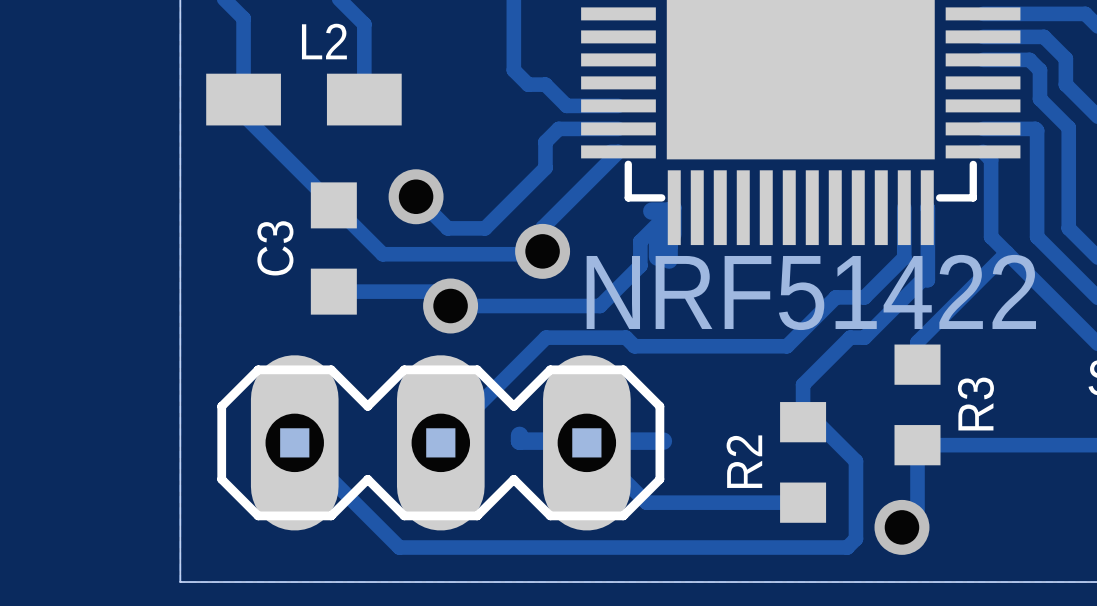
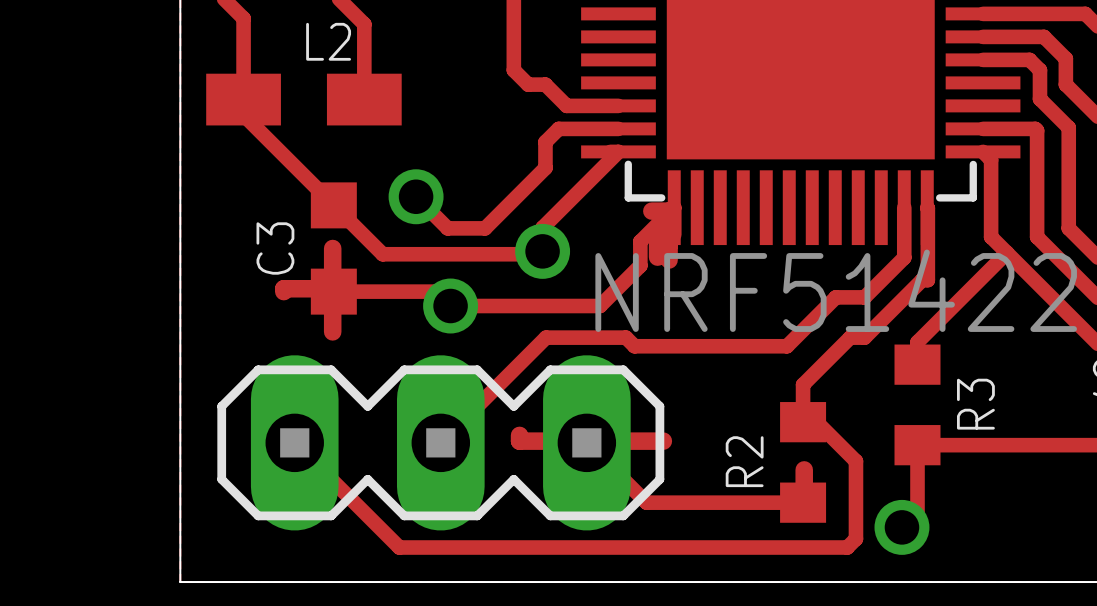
track: none -> (332, 248) (332, 331)
track: none -> (332, 288) (283, 288) (283, 291)
track: none -> (804, 469) (804, 490)

